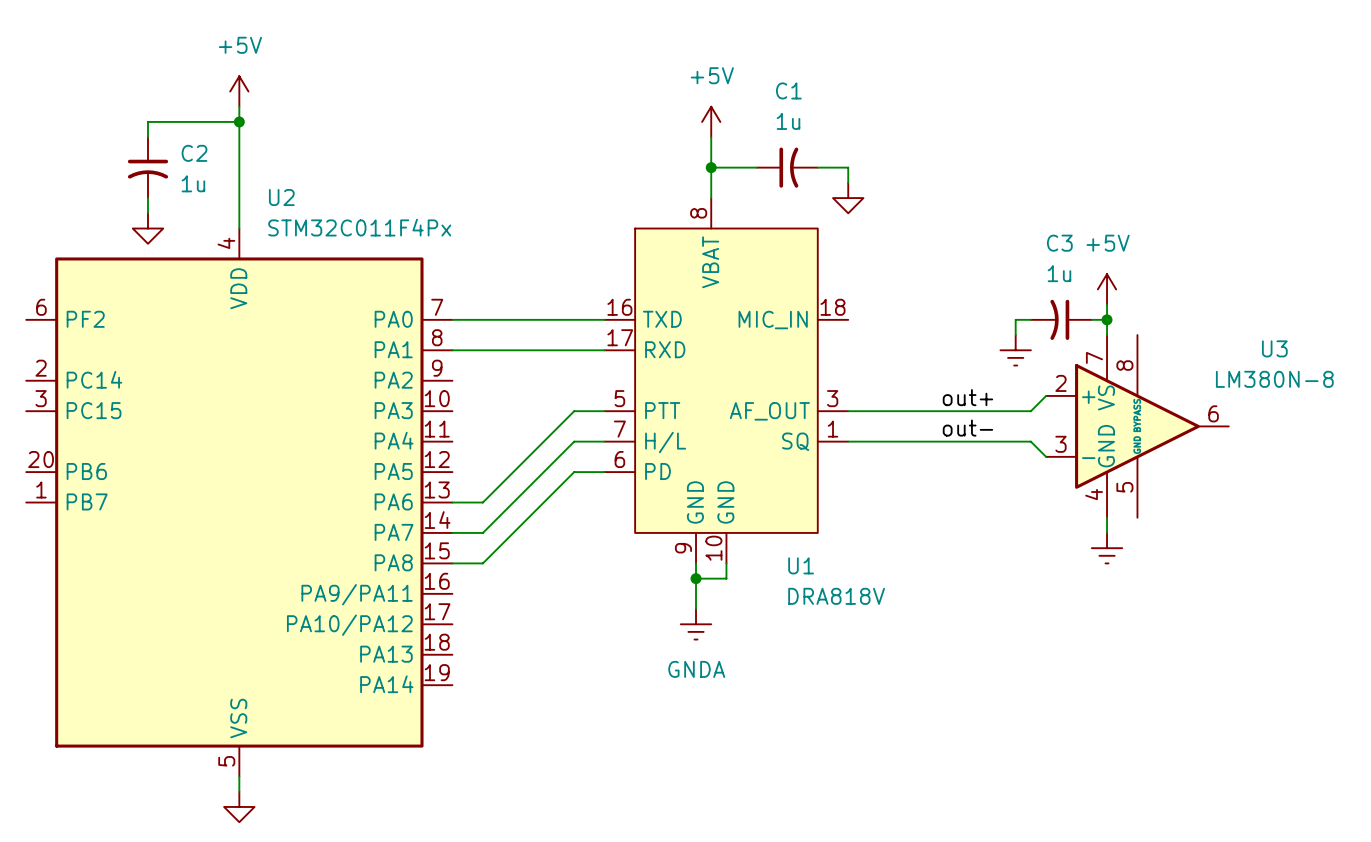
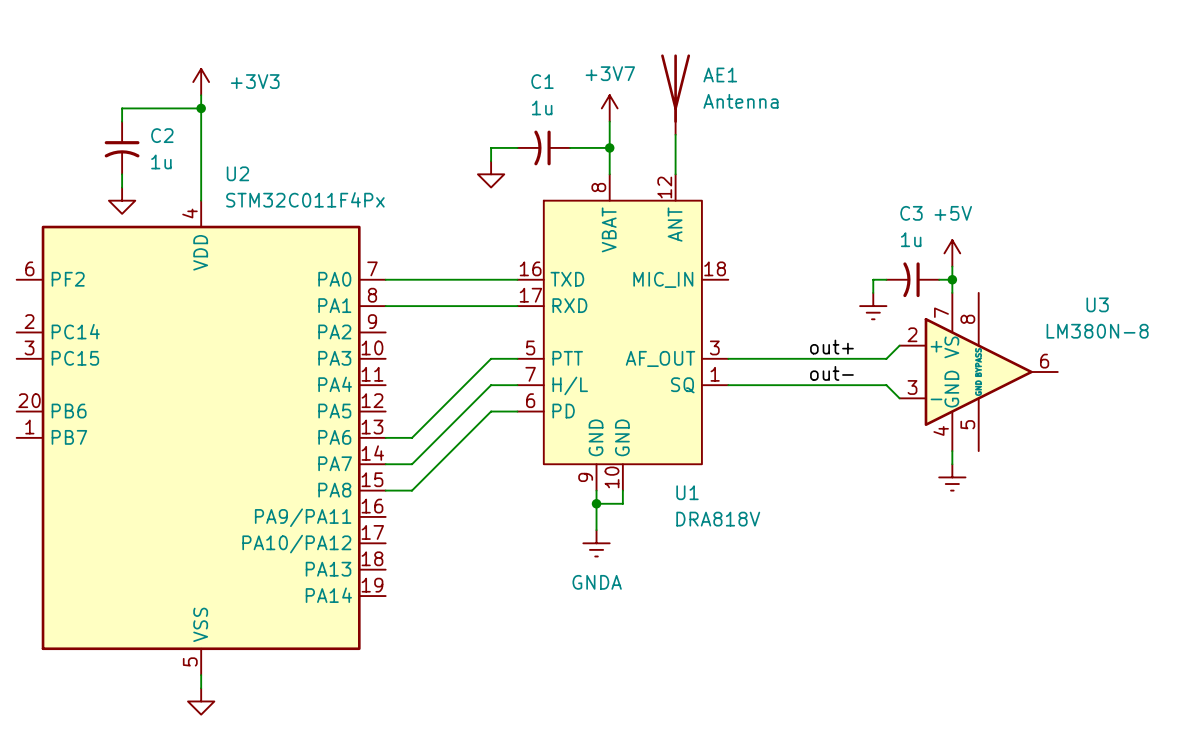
power symbol: +5V (239, 91) -> +3V3 (201, 82)
AE1: none -> Antenna (675, 94)
power symbol: +5V (711, 121) -> +3V7 (609, 108)
wire: none -> (675, 134) (675, 174)
wire: none -> (517, 147) (491, 147) (491, 161)
wire: (711, 167) (756, 167) -> (609, 147) (570, 147)
C1 position: (787, 167) -> (543, 147)
C1 rotation: 0° (788, 167) -> 180° (542, 147)
wire: (817, 167) (848, 167) (848, 182) -> none
U1 symbol: [604, 198, 849, 564] -> [517, 174, 729, 491]
power symbol position: (848, 198) -> (491, 174)

